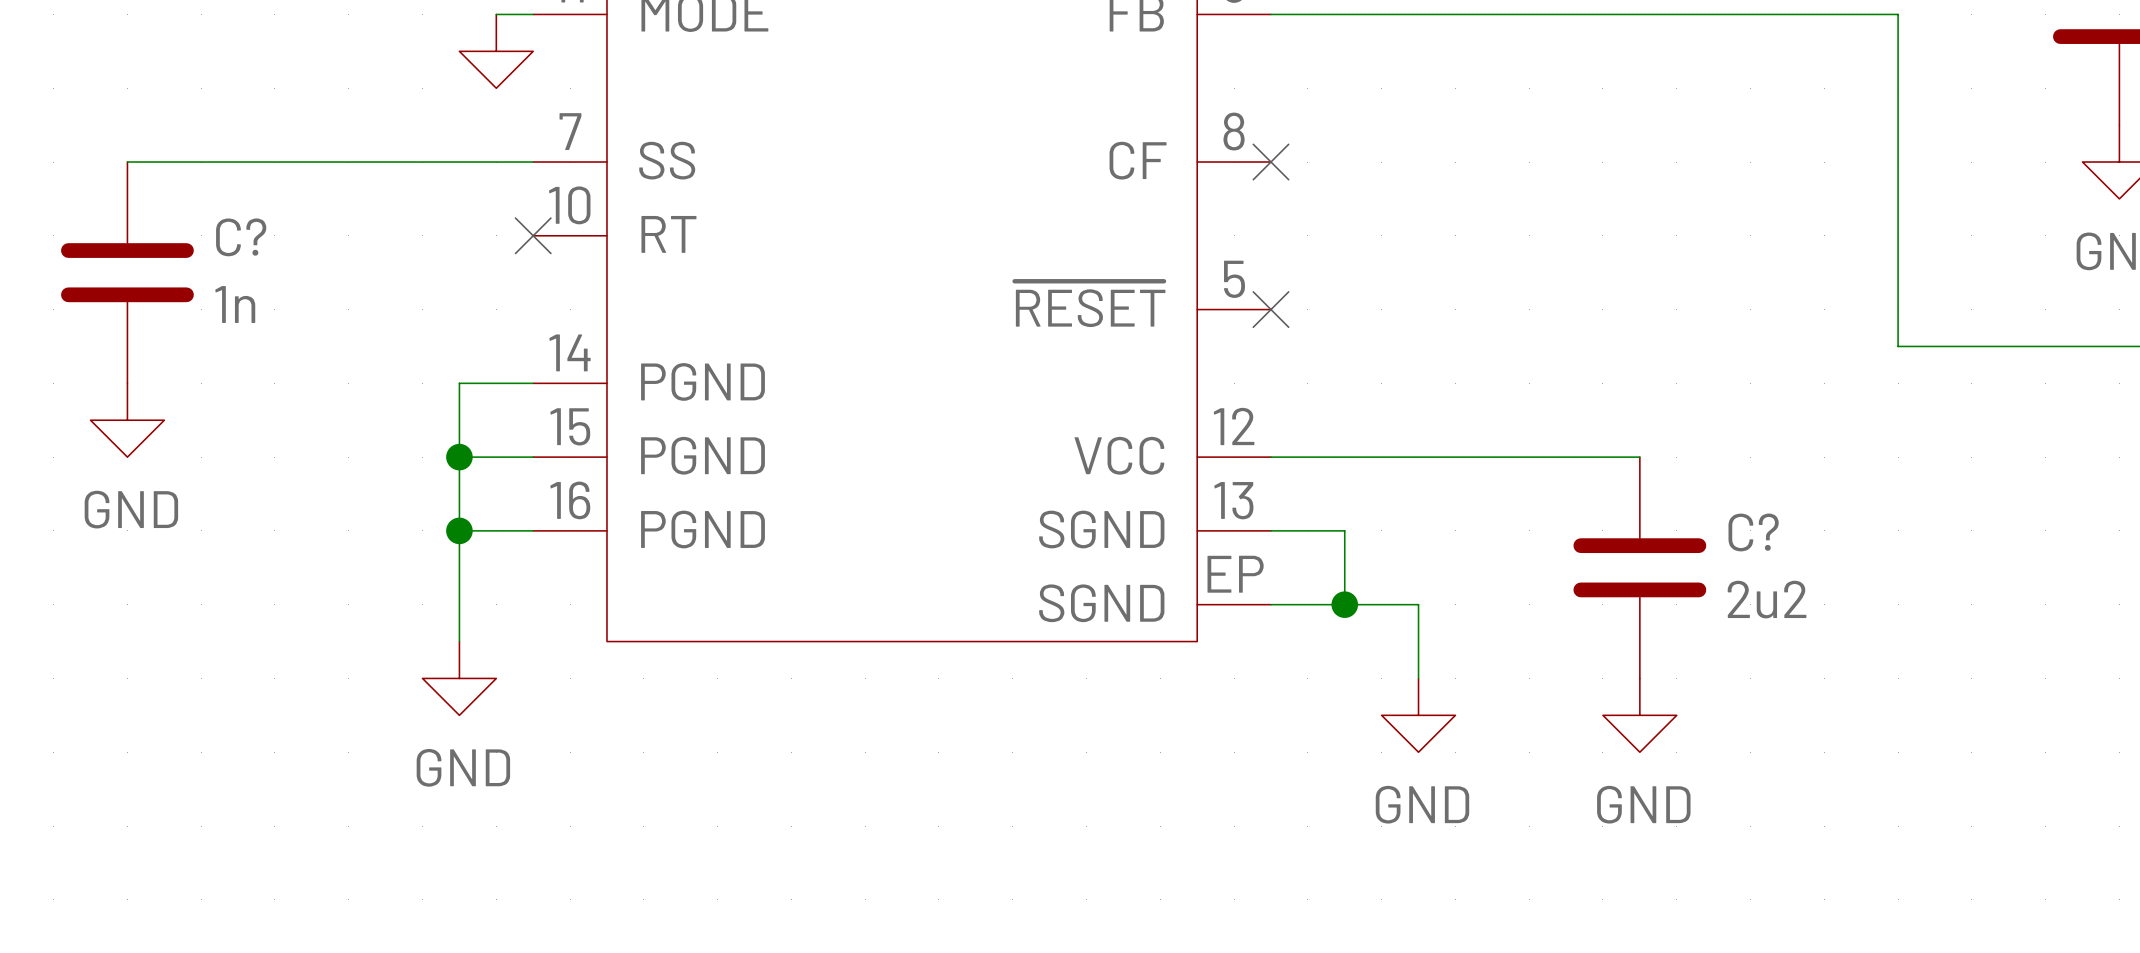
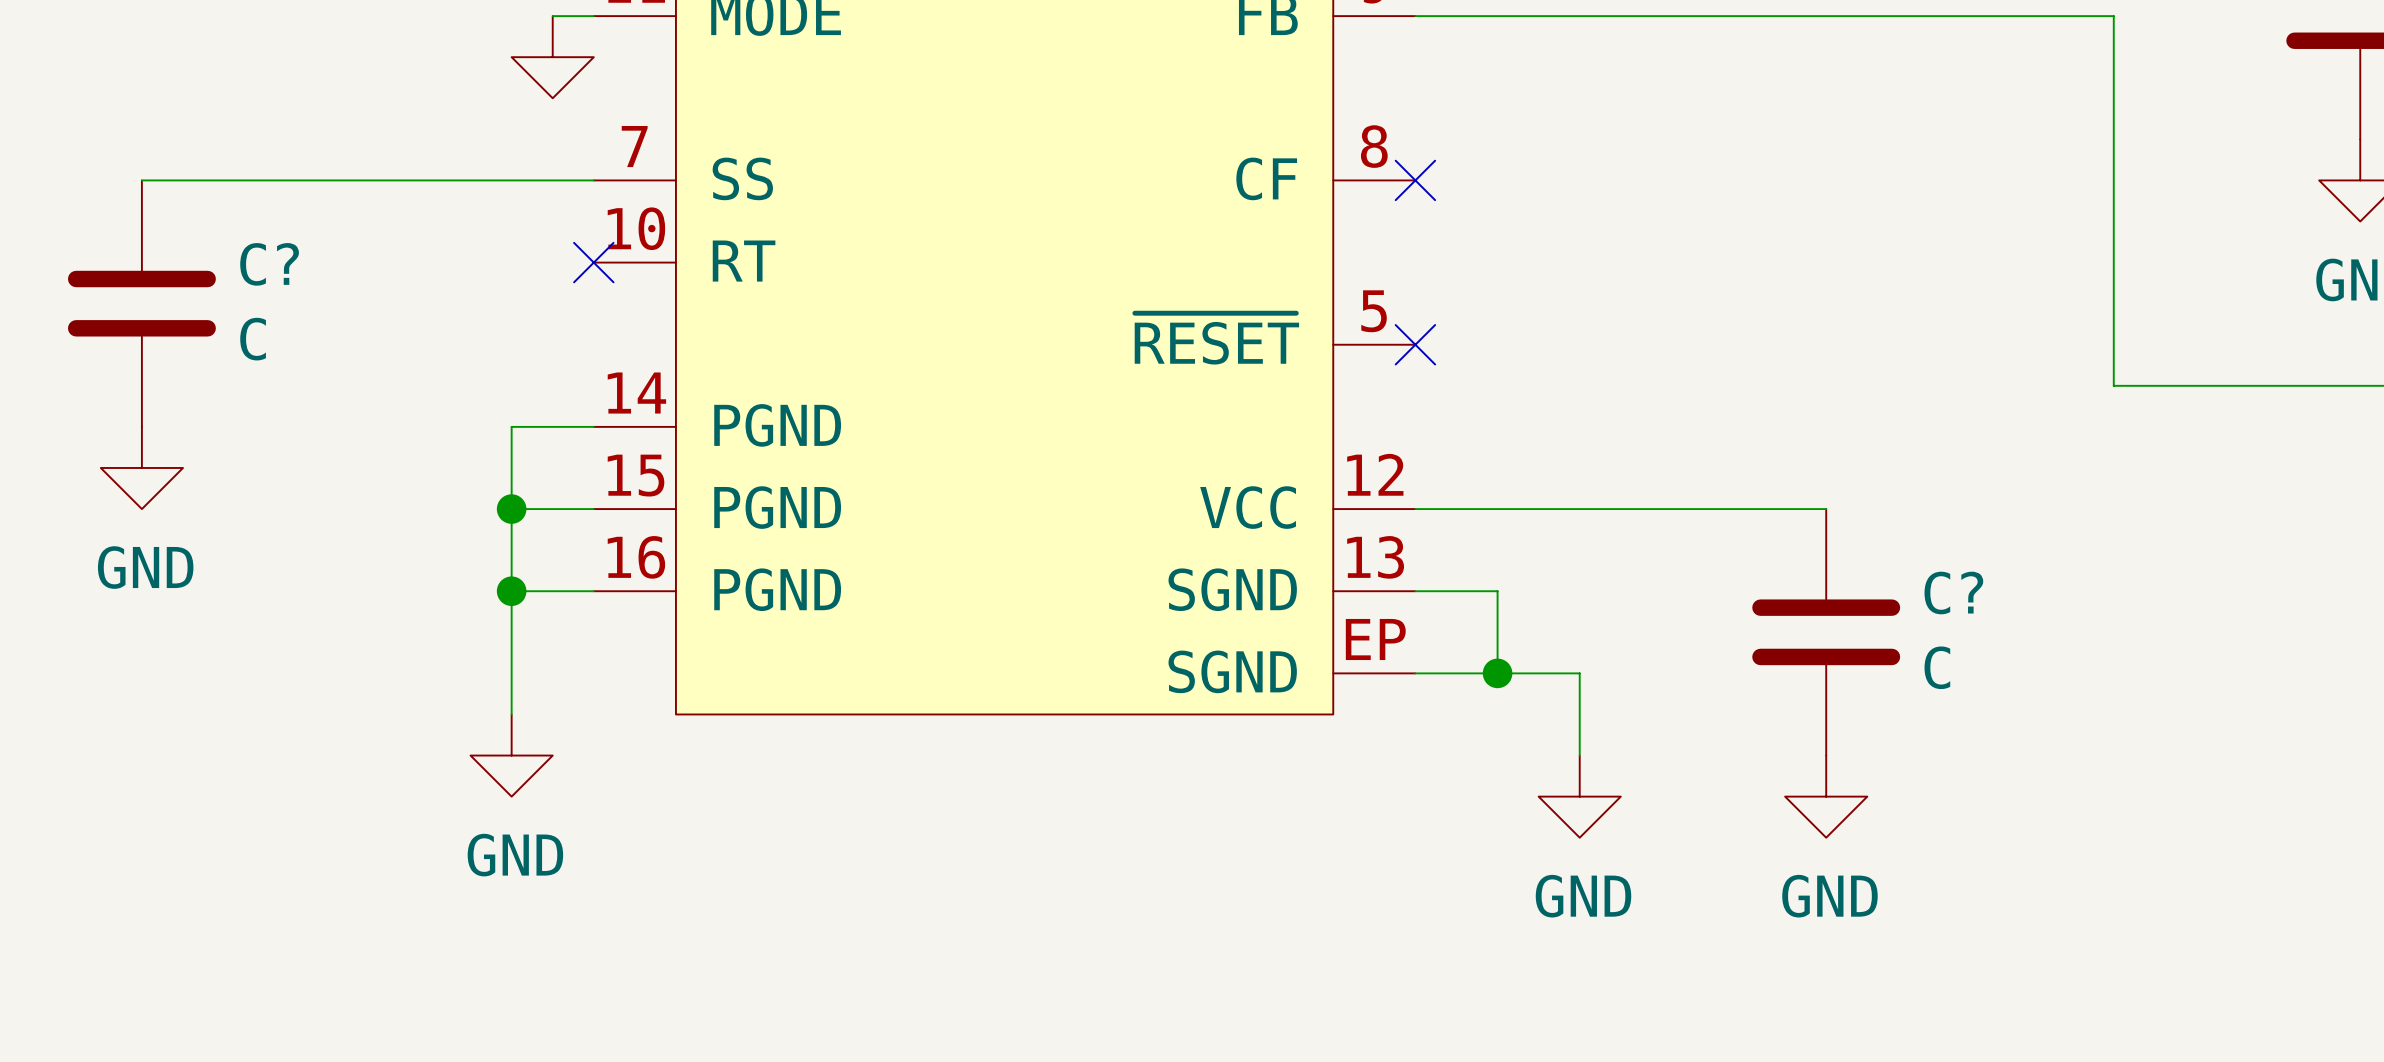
C? value: 1n (235, 304) -> C (253, 339)
C? value: 2u2 (1767, 599) -> C (1937, 667)

